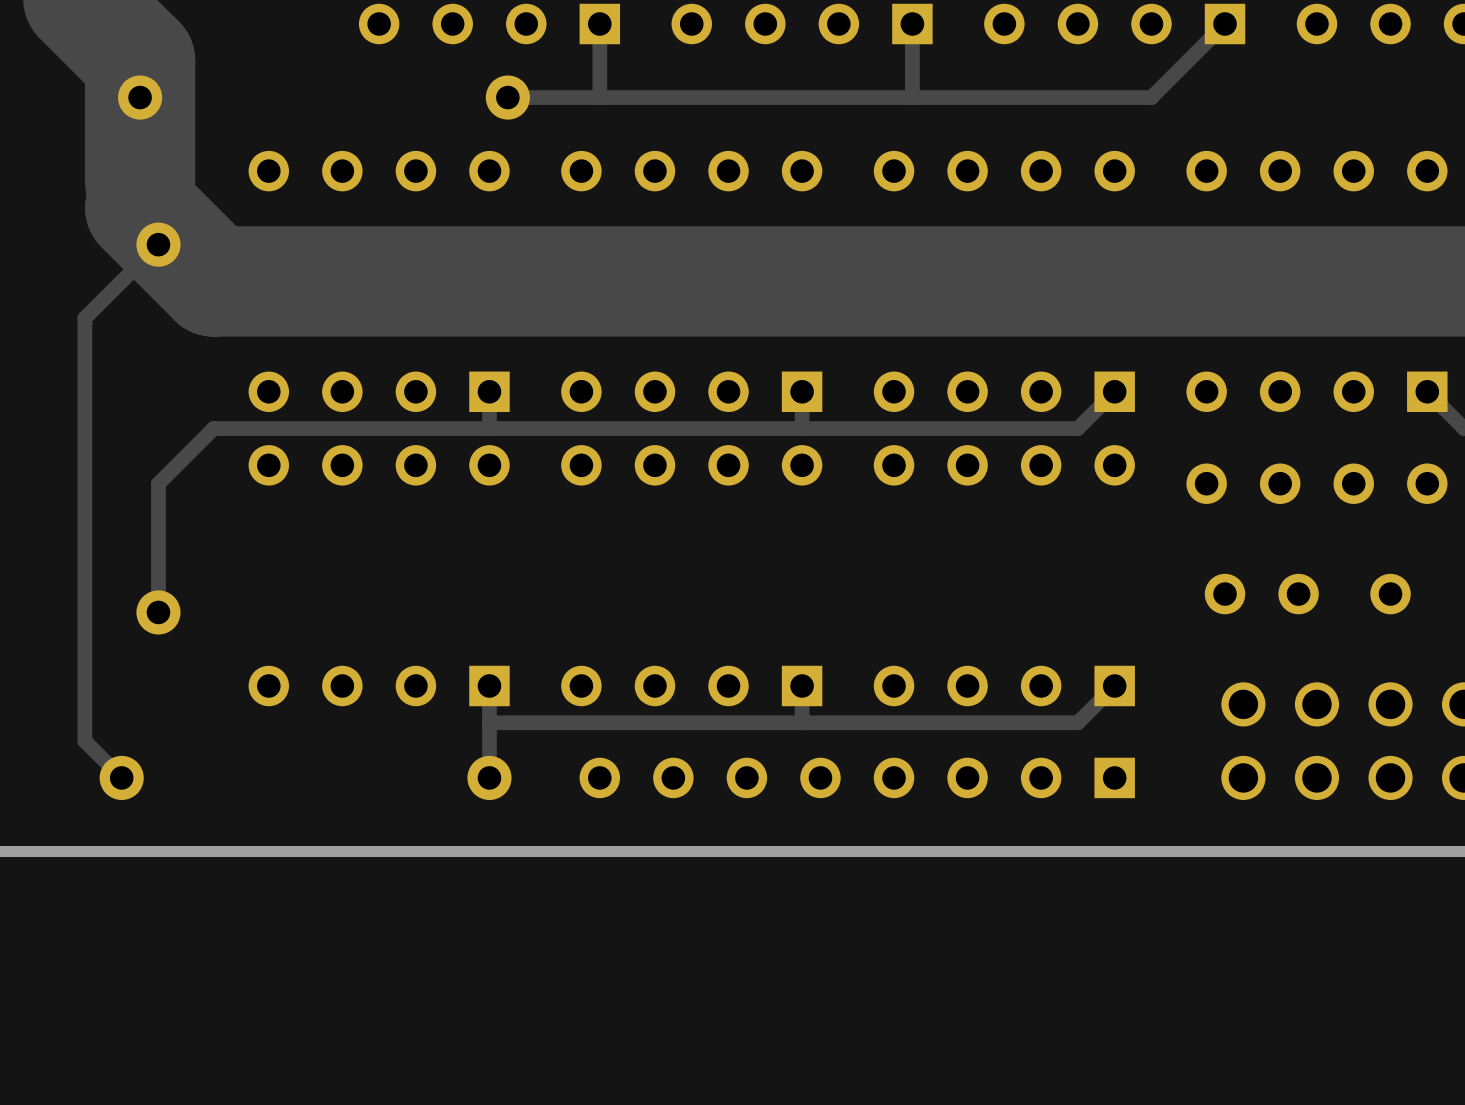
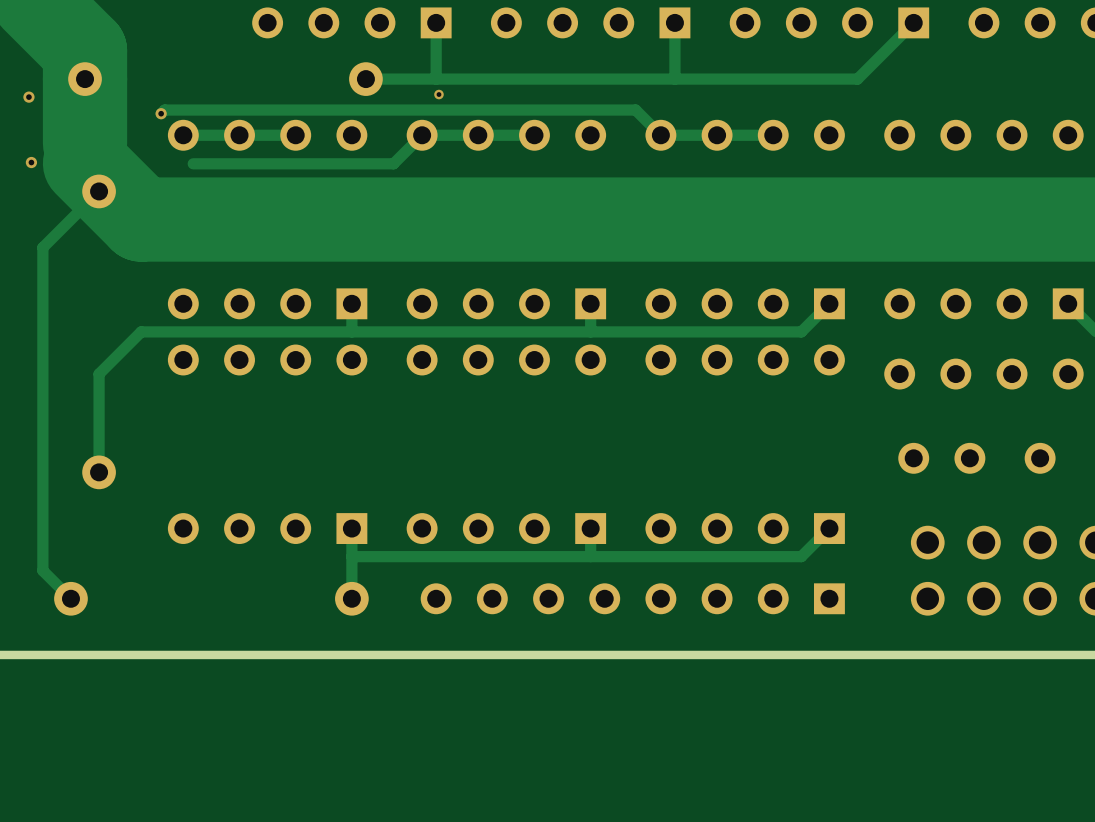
via: none -> (438, 94)
via: none -> (28, 97)
track: none -> (161, 113) (164, 110) (635, 110) (660, 135) (773, 135)
via: none -> (161, 113)
track: none -> (295, 135) (183, 135)
track: none -> (534, 135) (422, 135) (393, 163) (193, 163)
via: none -> (31, 162)

